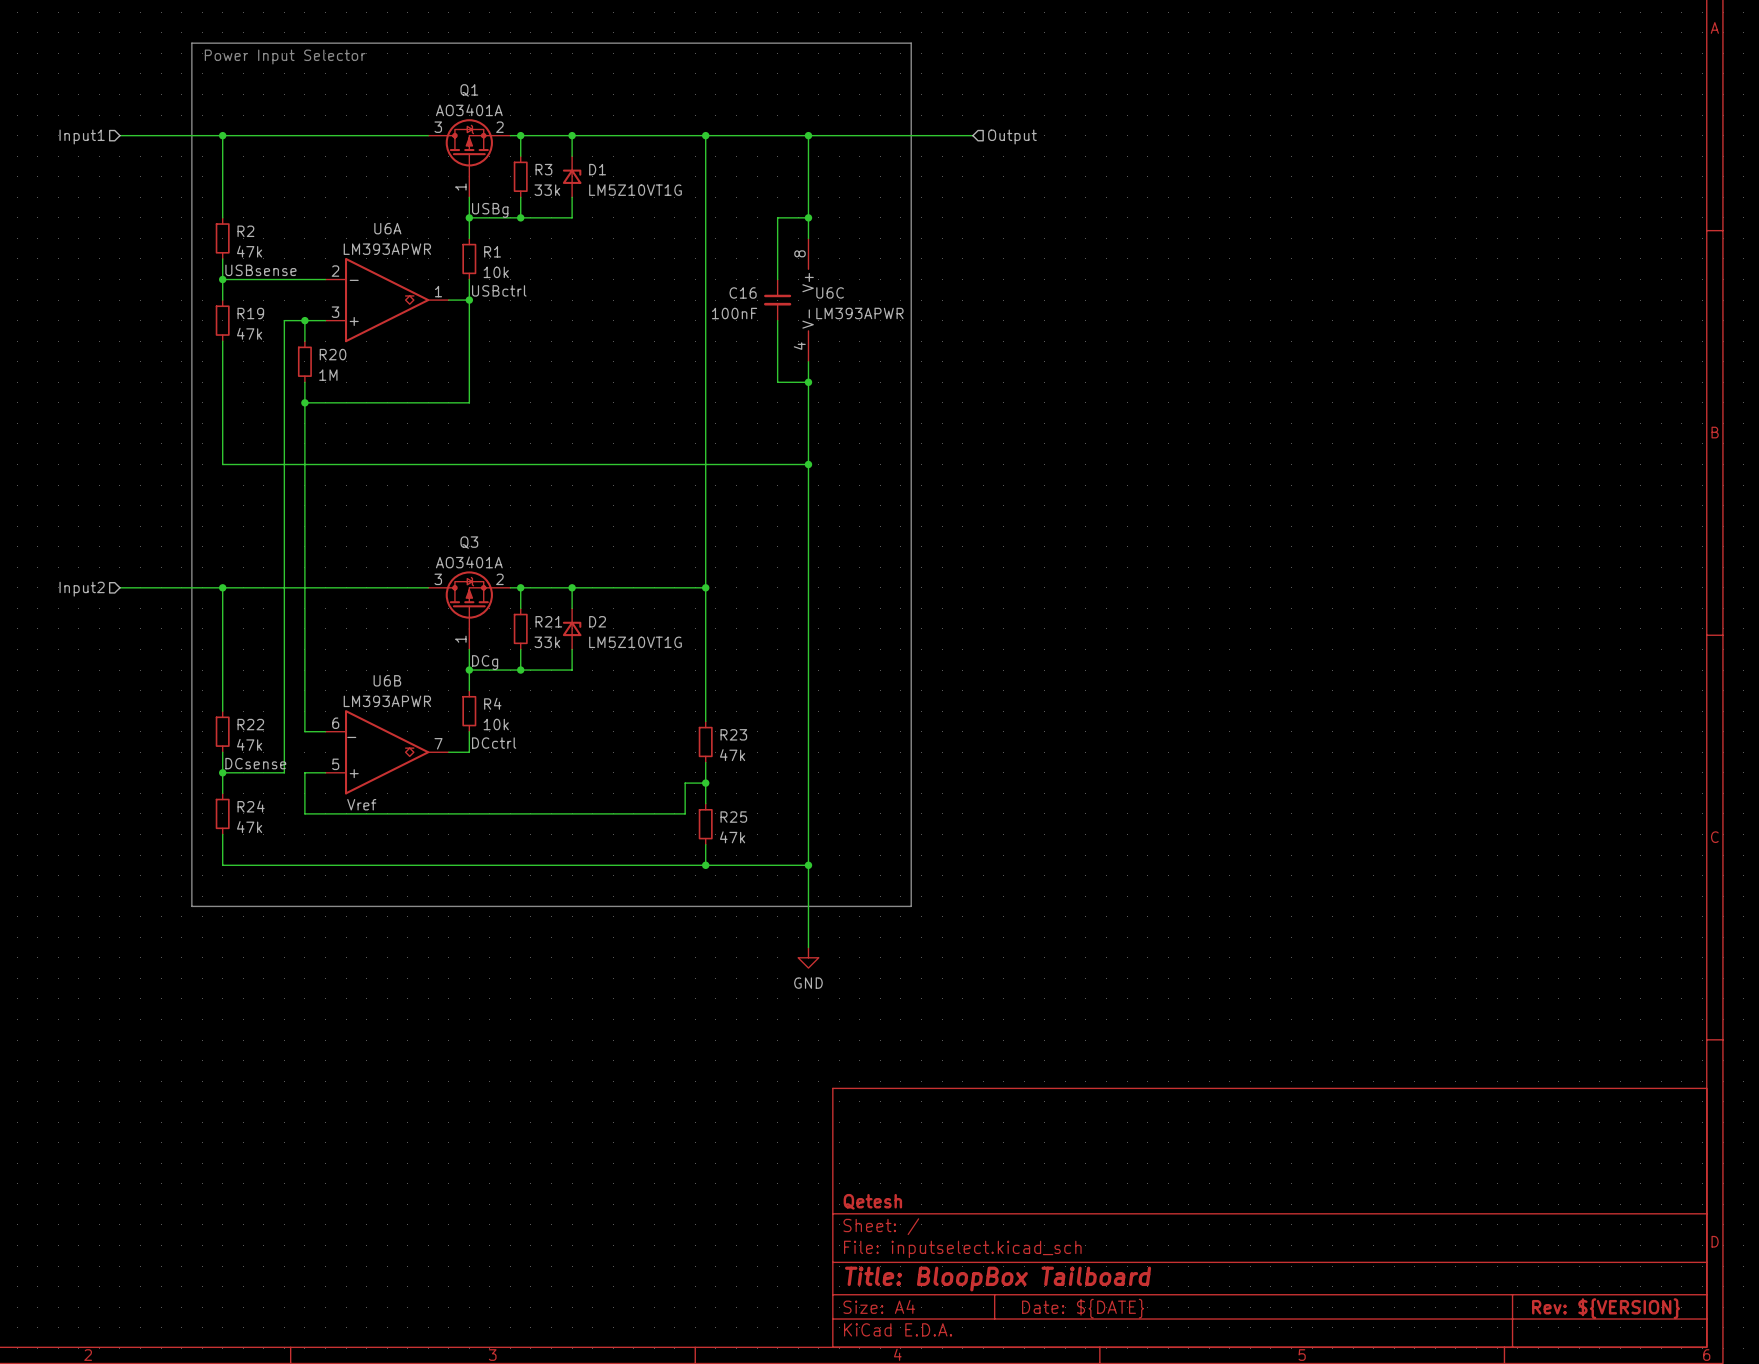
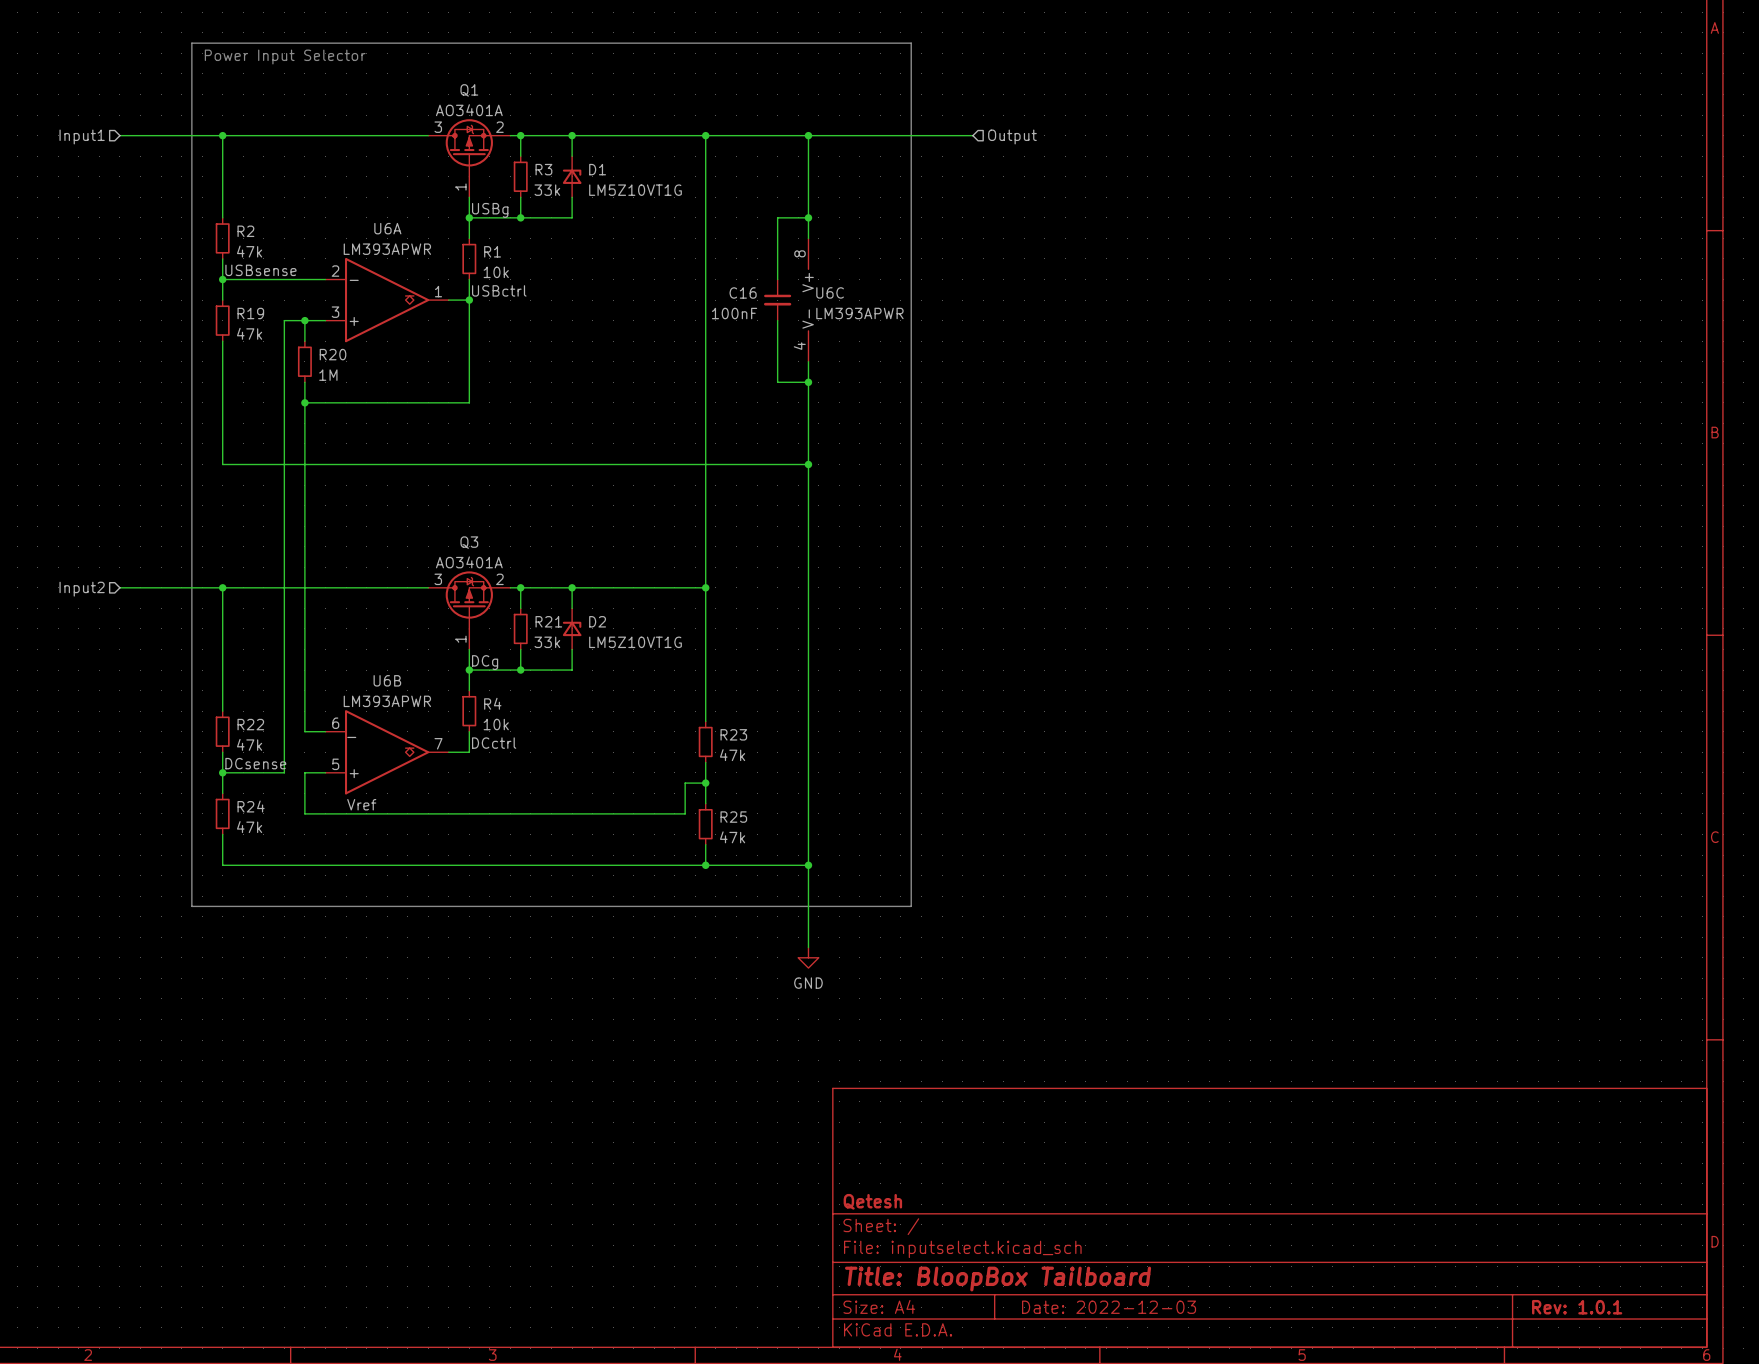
title block: Date: ${DATE} (1083, 1308) -> Date: 2022-12-03 (1109, 1307)
title block: Rev: ${VERSION} (1606, 1308) -> Rev: 1.0.1 (1577, 1307)

